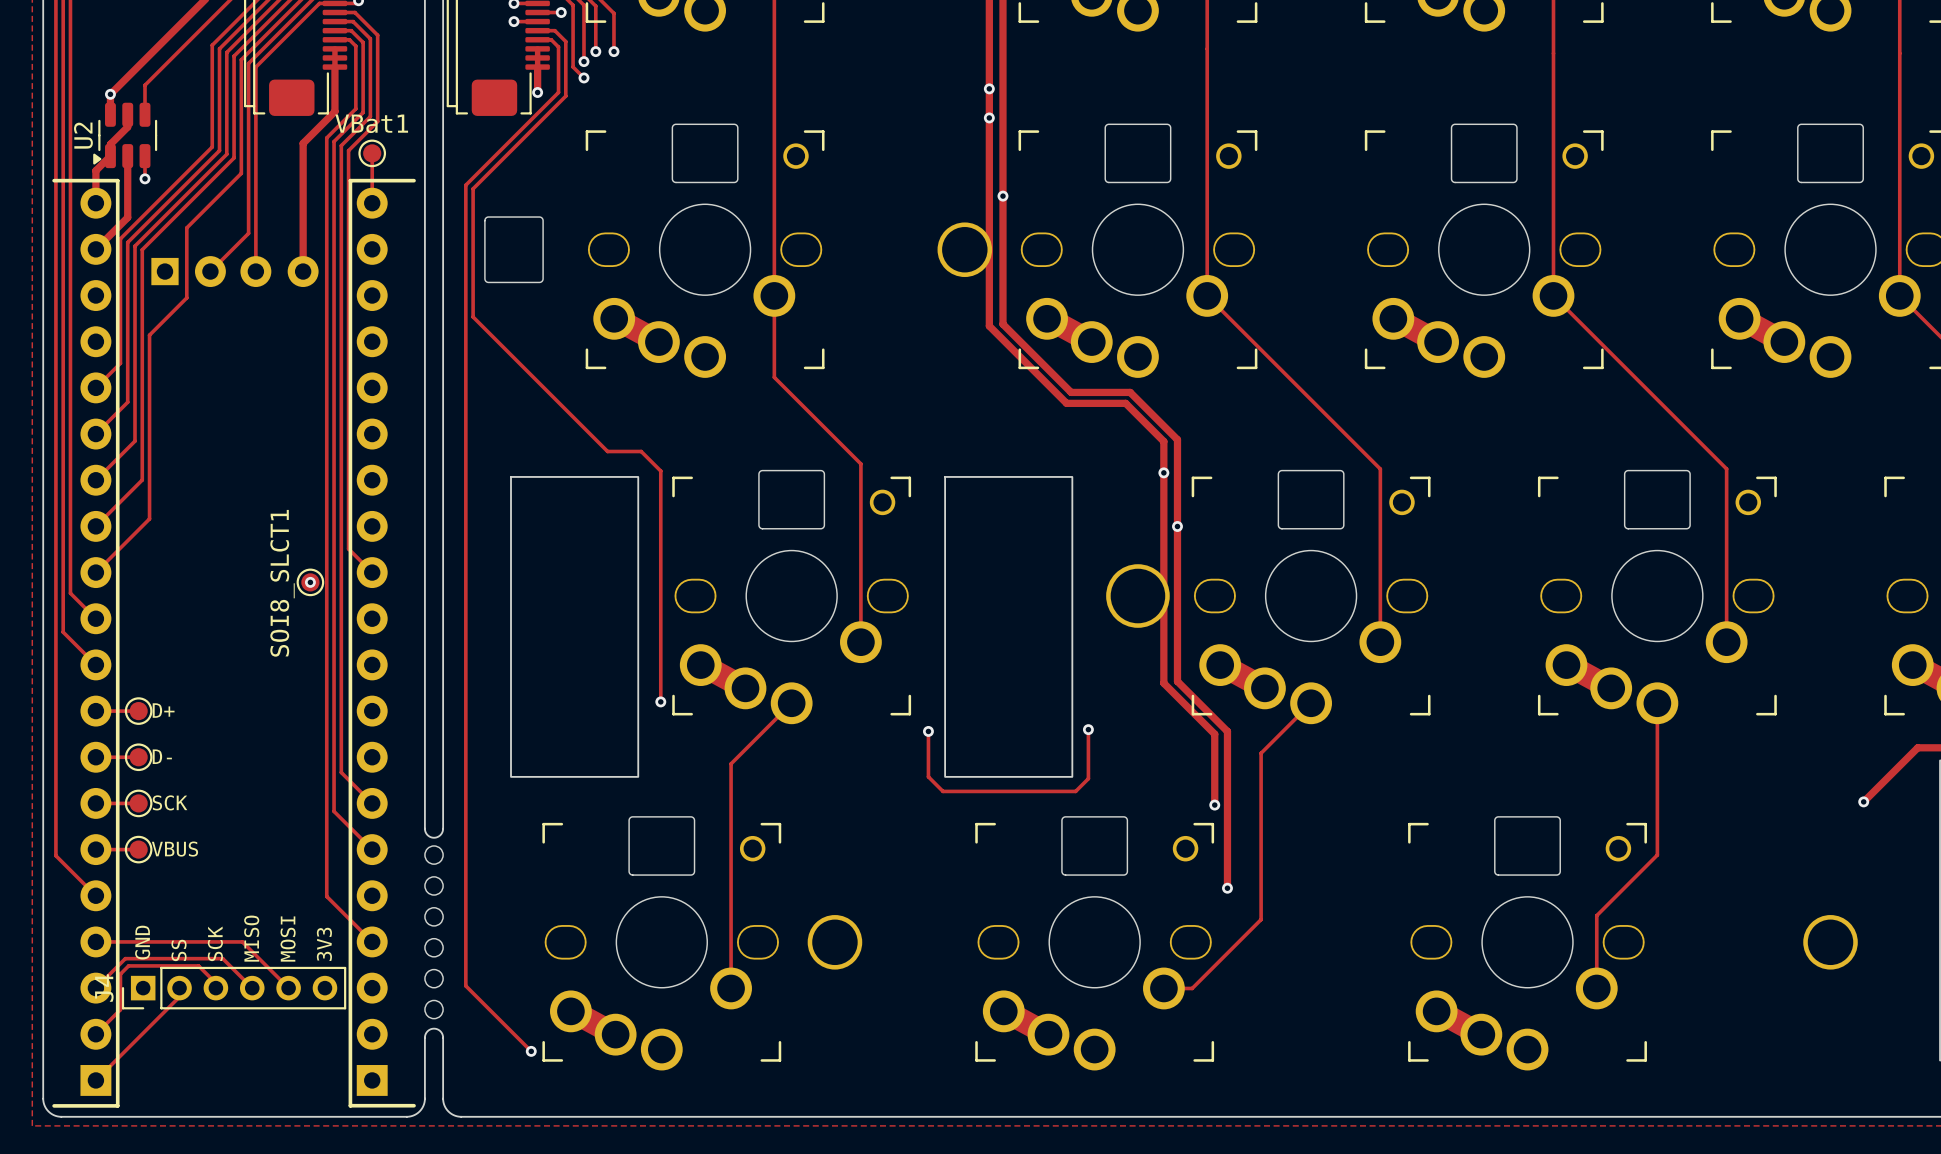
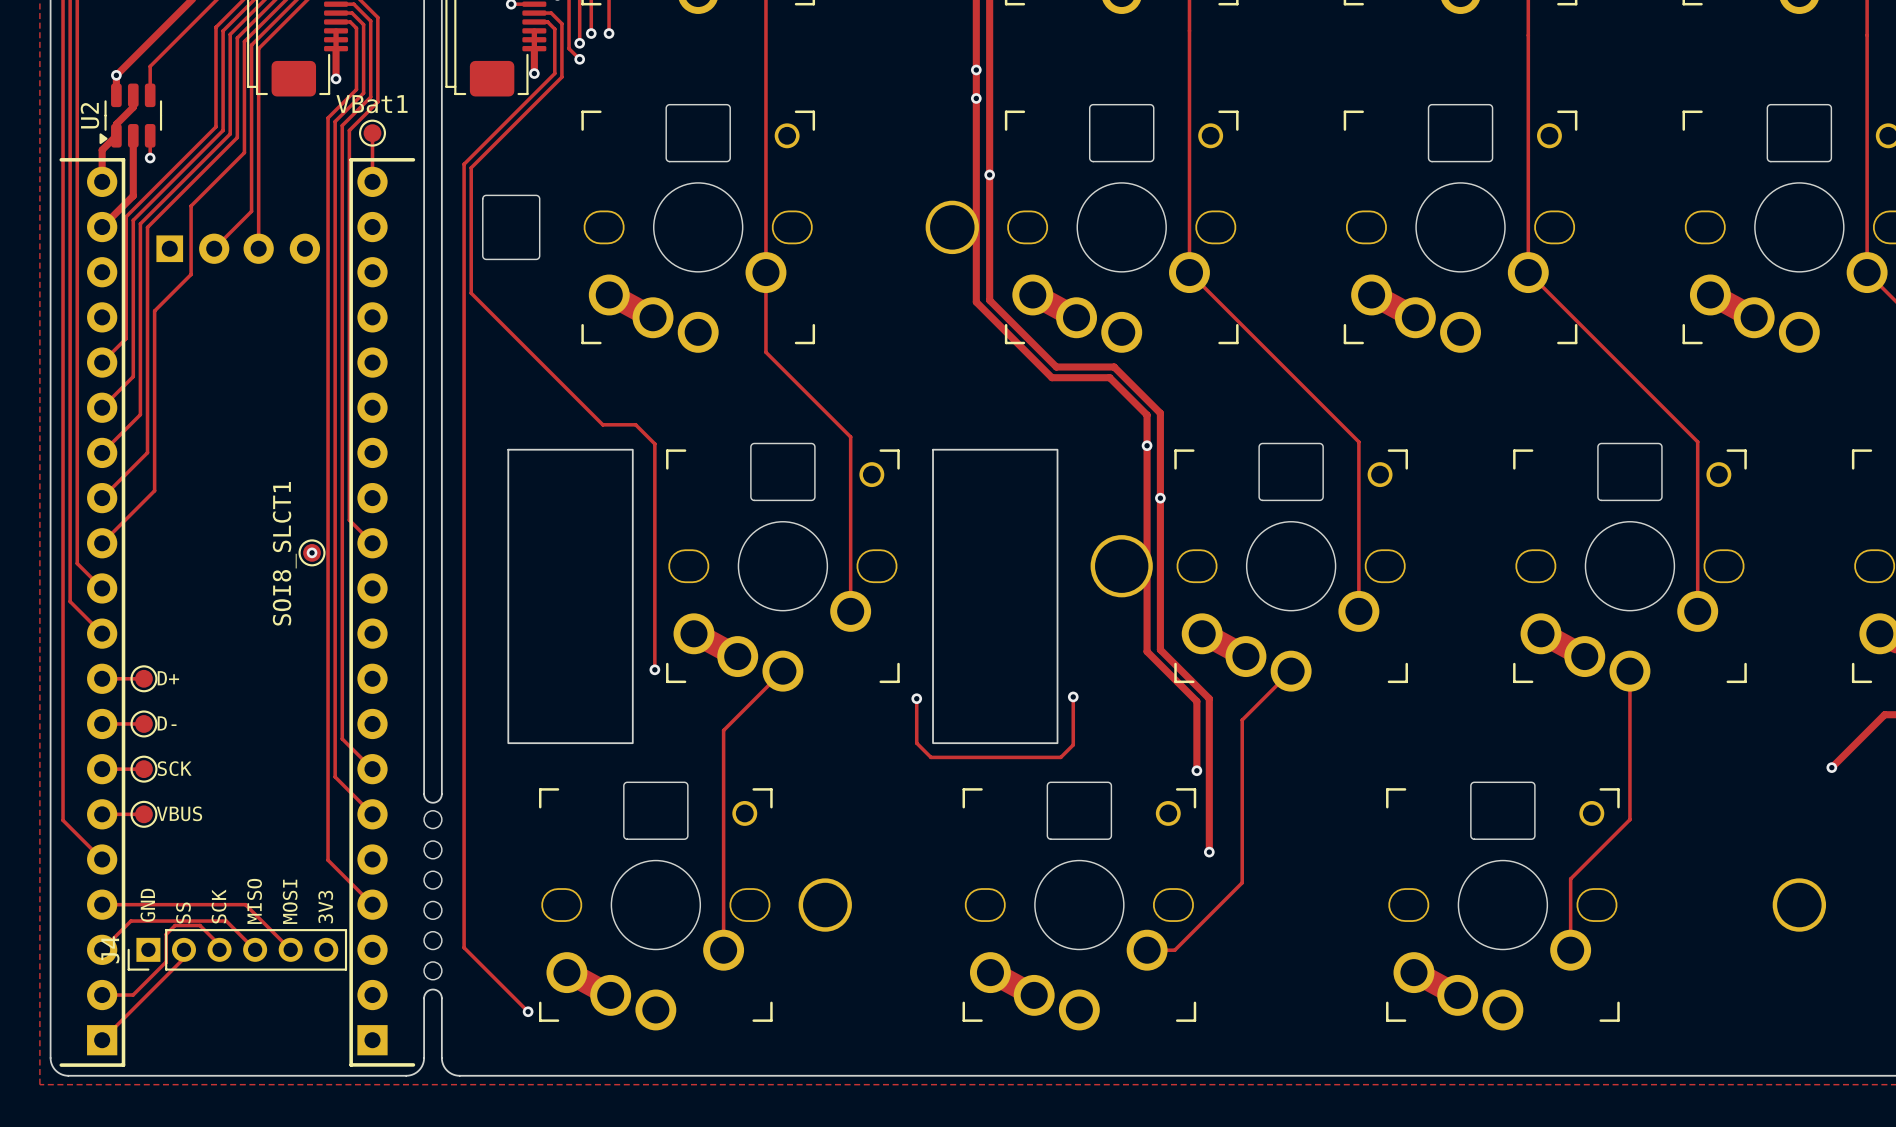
track: (334, 97) (334, 111) (303, 143) (303, 271) -> none
via: none -> (336, 78)
track: (198, 965) (128, 965) (120, 974) (120, 1009) (95, 1034) -> (202, 928) (199, 925) (175, 925) (166, 934) (166, 962) (133, 995) (102, 995)

